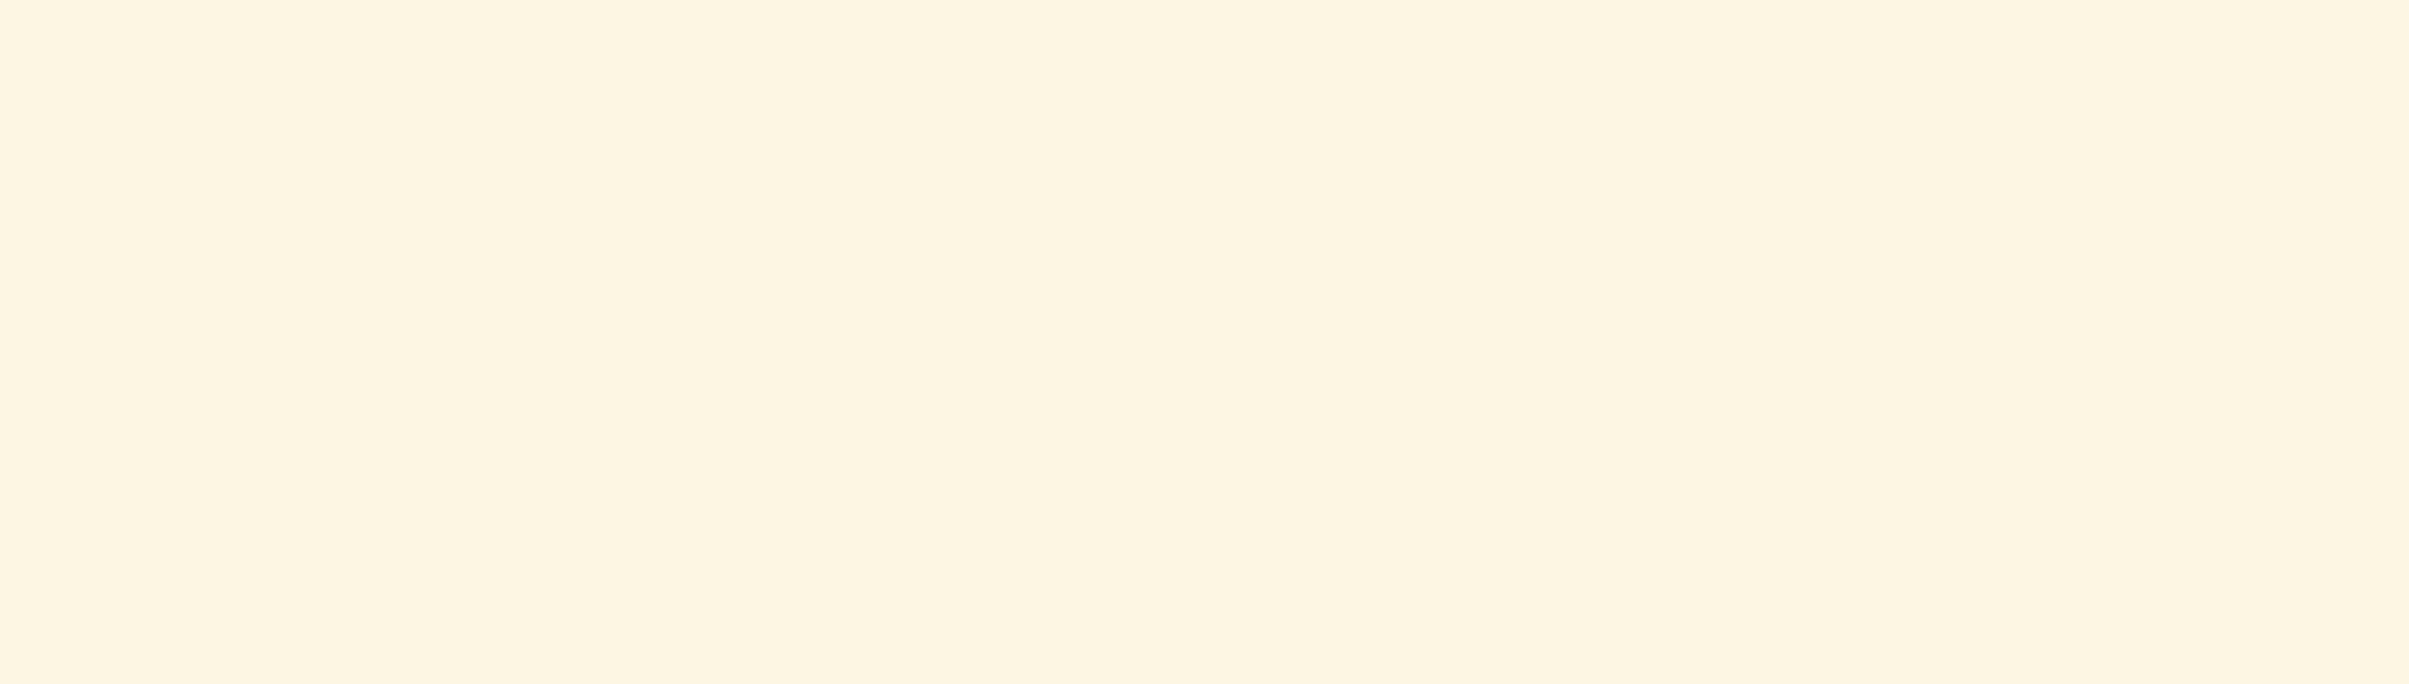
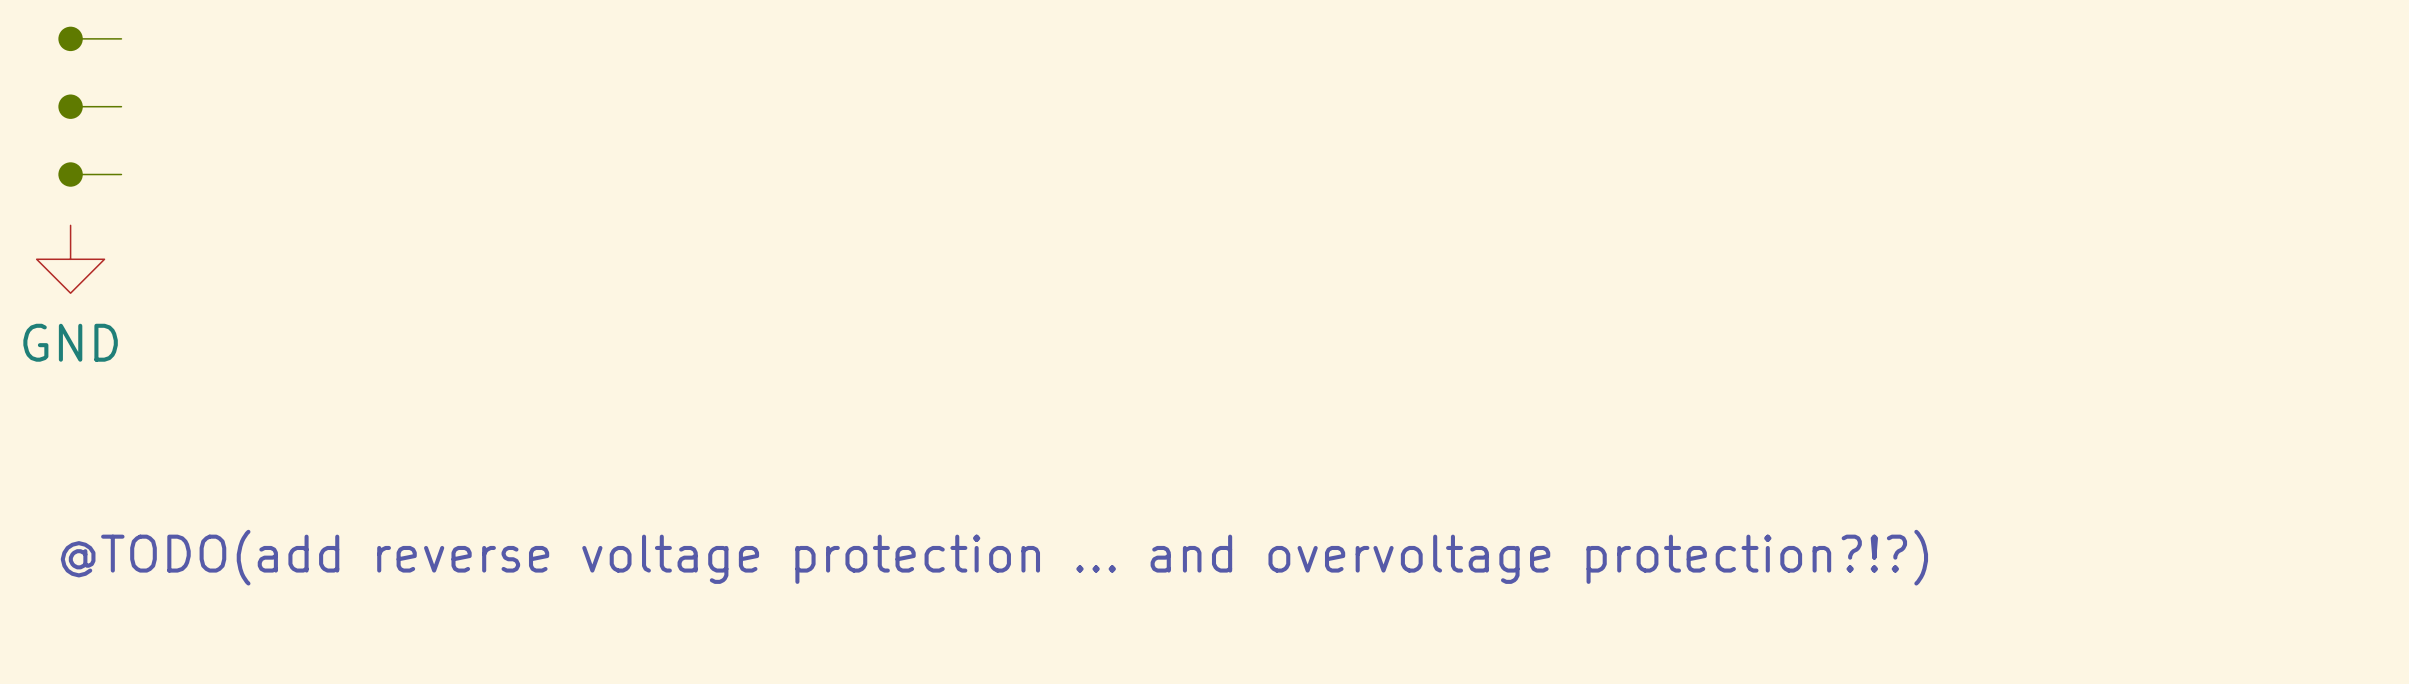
wire: none -> (70, 38) (121, 38)
junction: none -> (70, 38)
wire: none -> (70, 106) (121, 106)
junction: none -> (70, 106)
wire: none -> (70, 174) (121, 174)
junction: none -> (70, 174)
power symbol: none -> GND (70, 259)
text: none -> @TODO(add reverse voltage protection … and overvoltage protection?!?) (994, 557)

